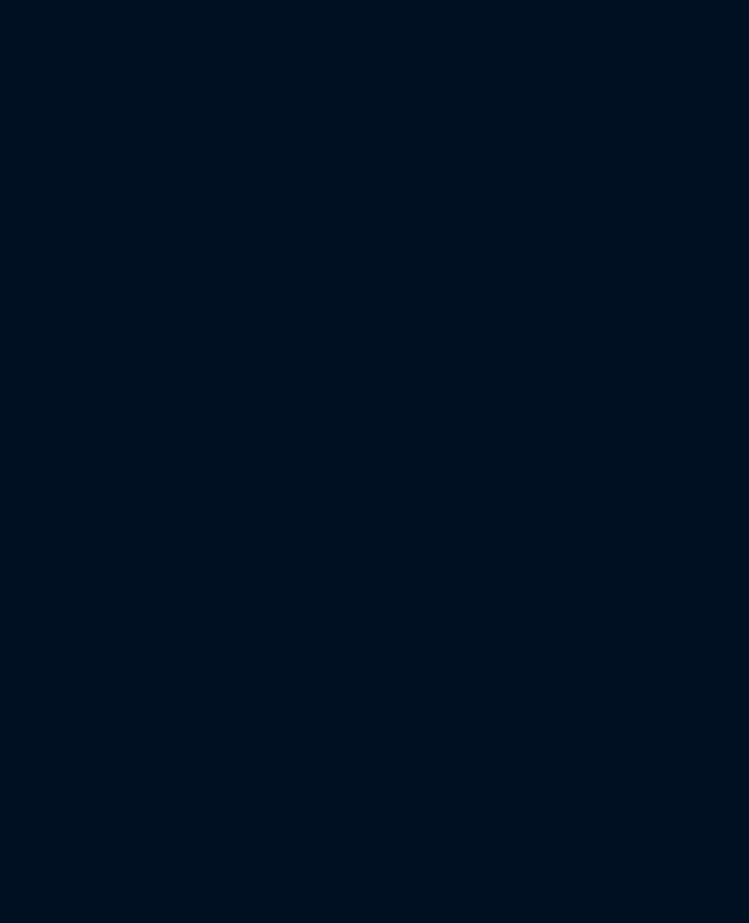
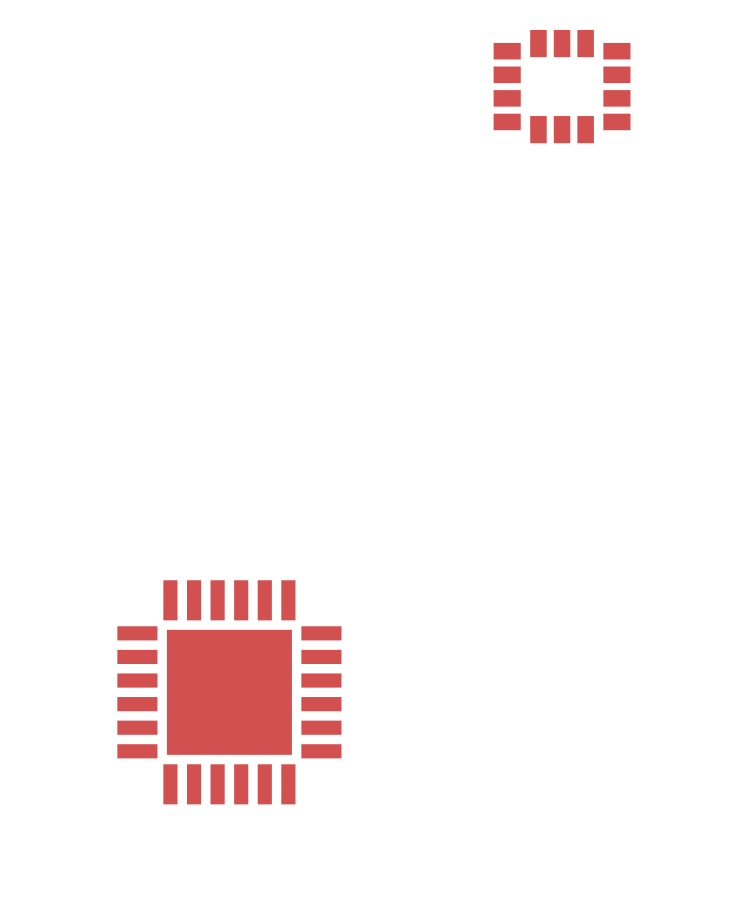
part: none -> (562, 86)
part: none -> (229, 692)

